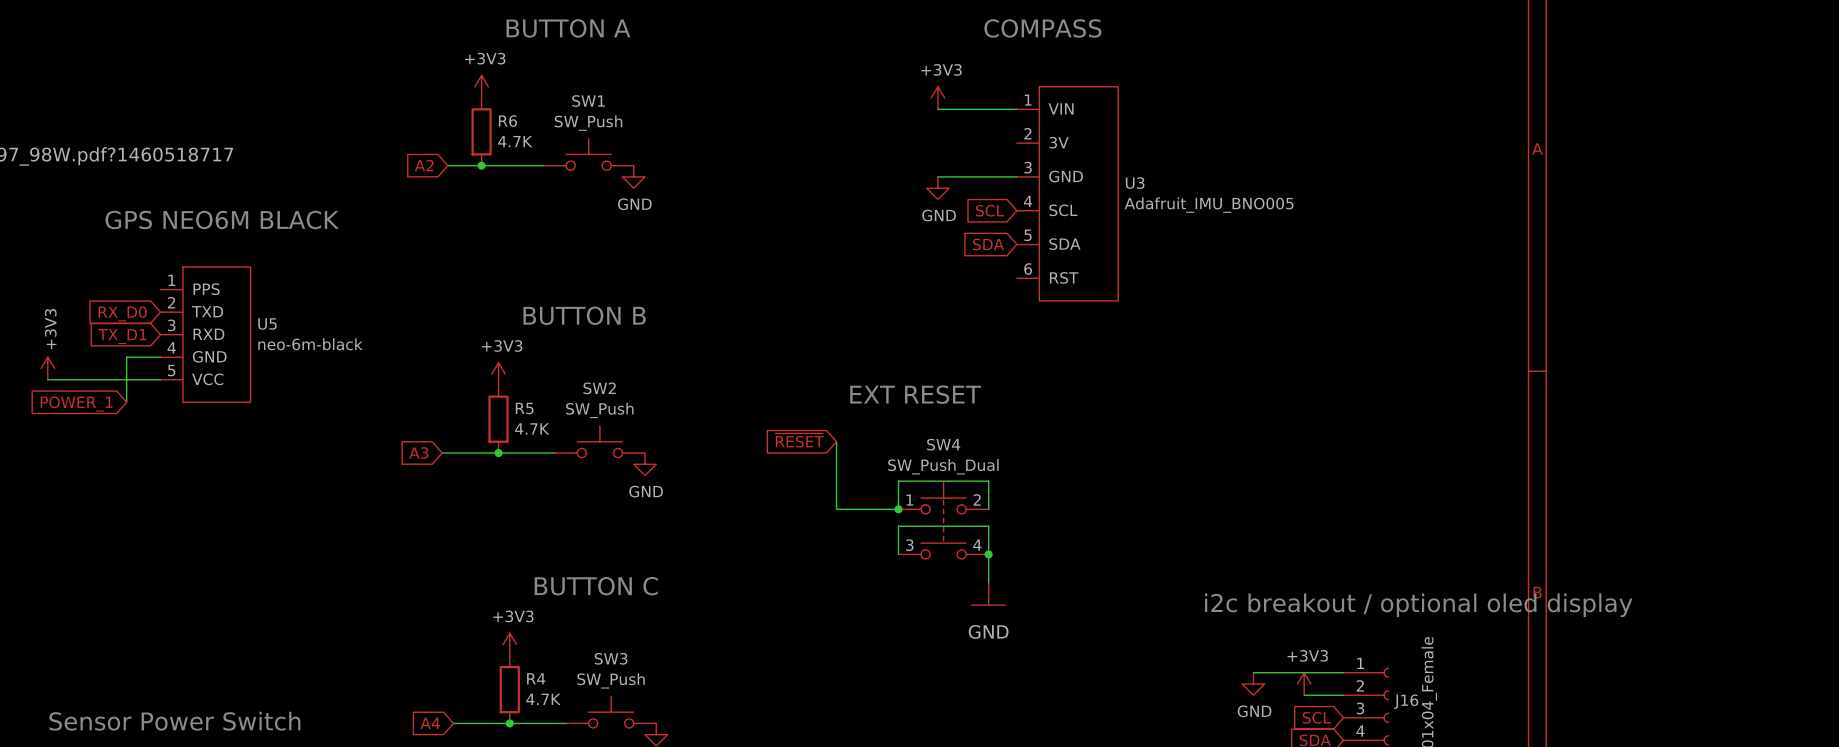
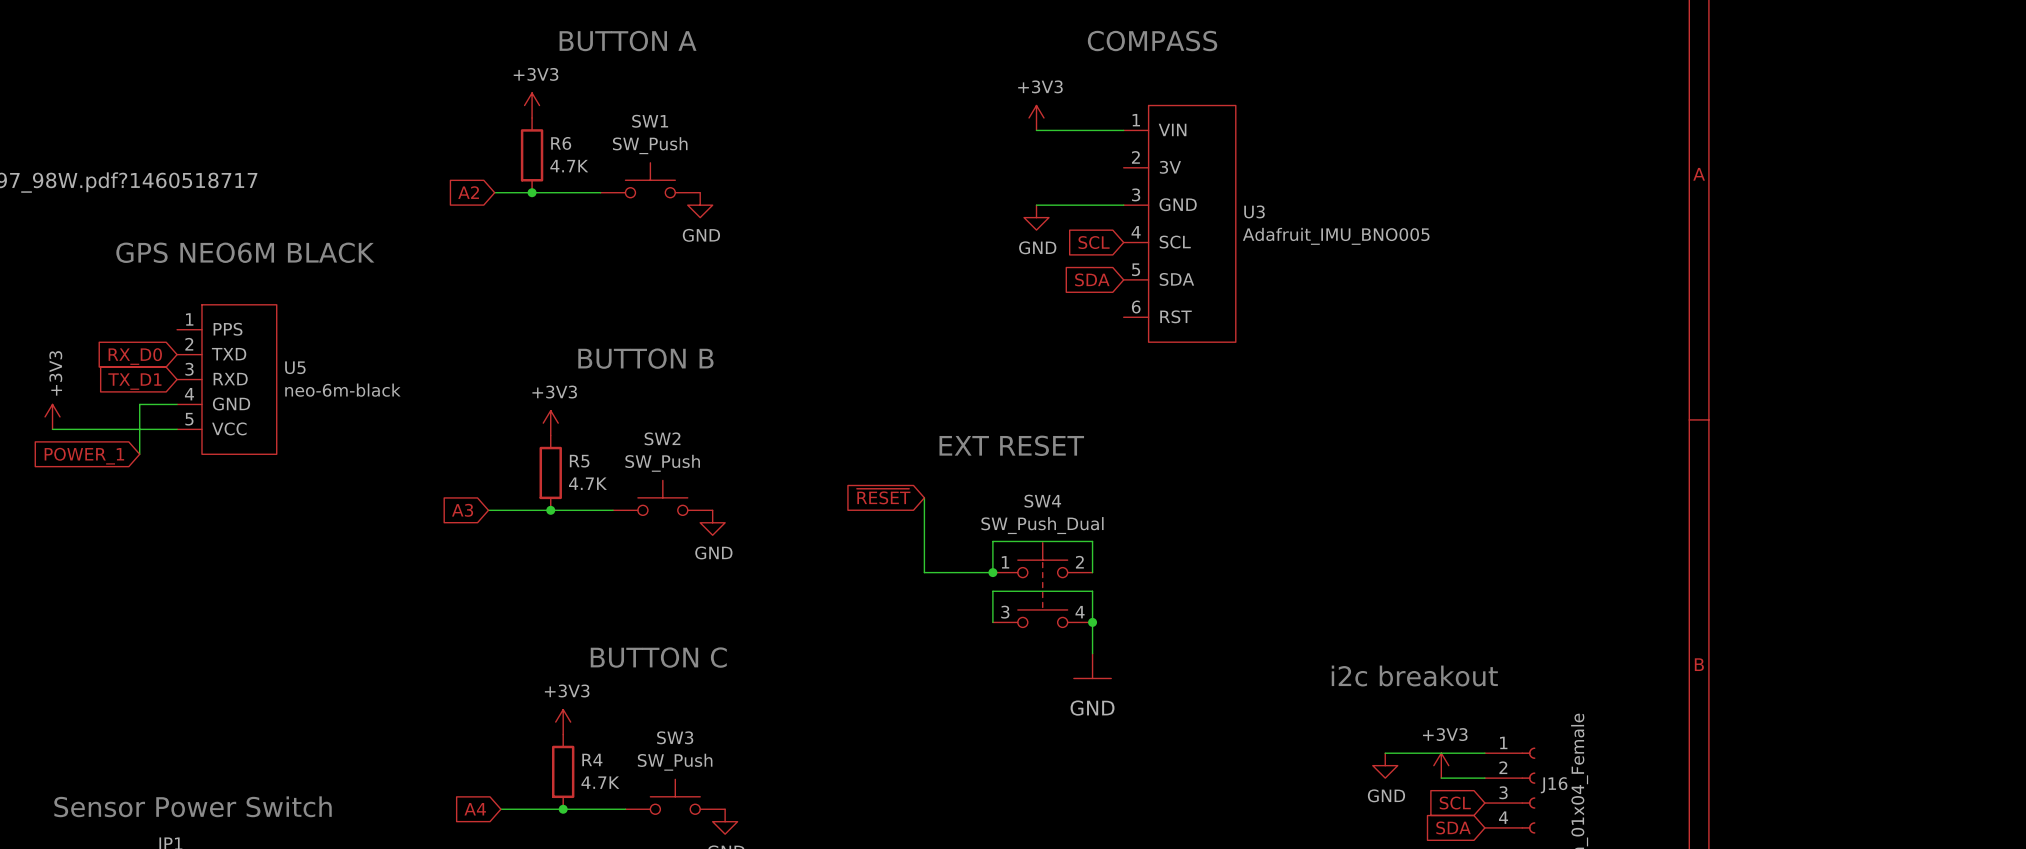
text: i2c breakout / optional oled display (1418, 605) -> i2c breakout (1414, 676)

